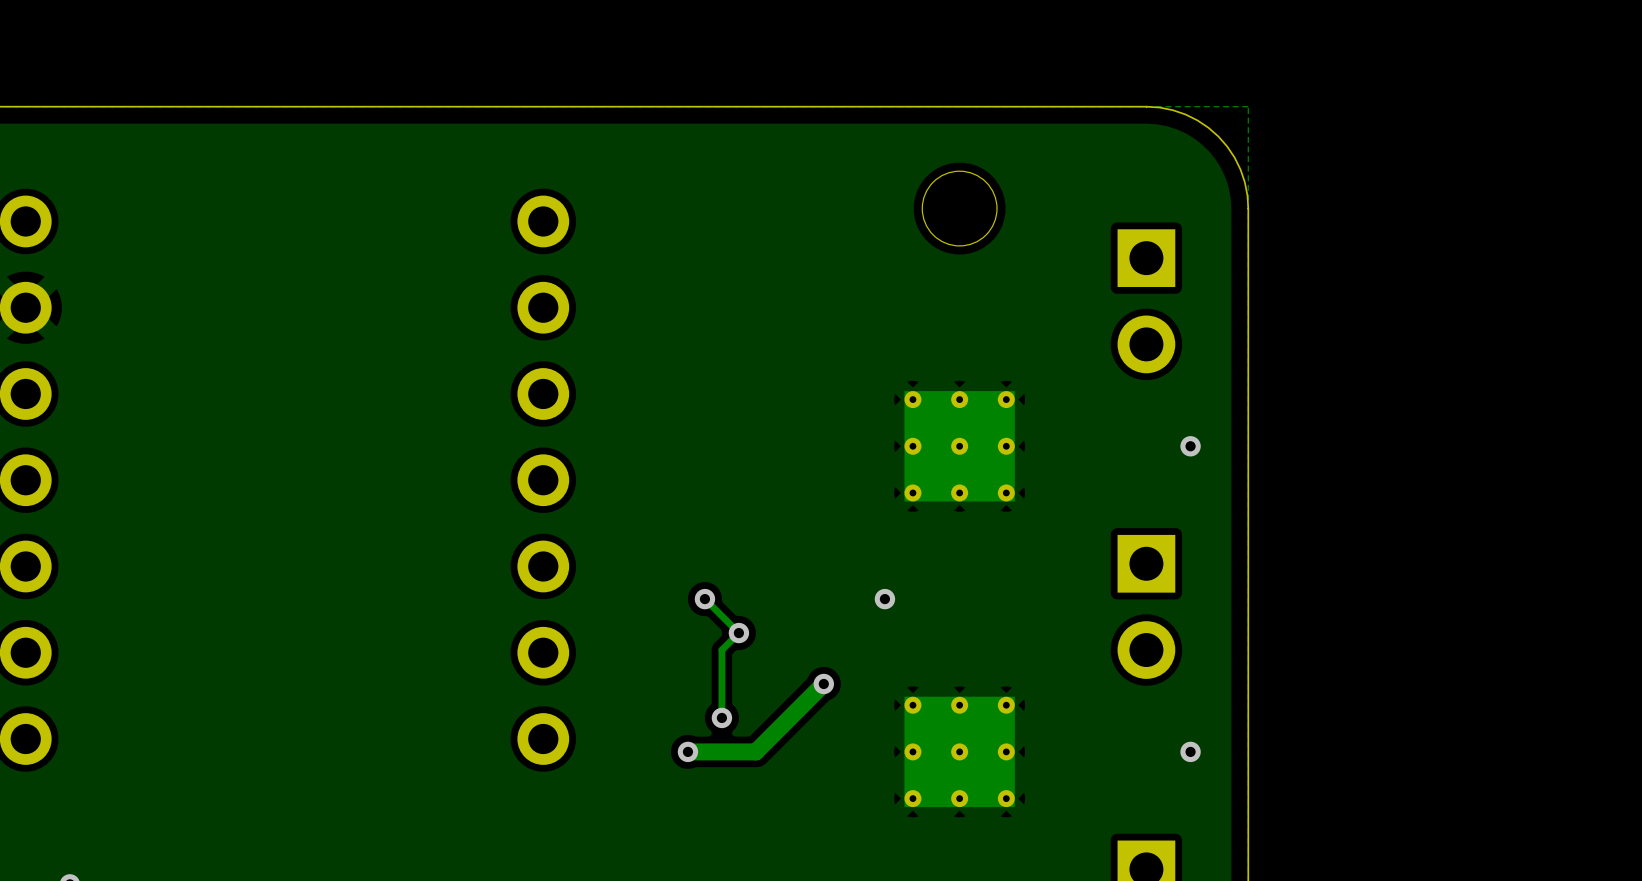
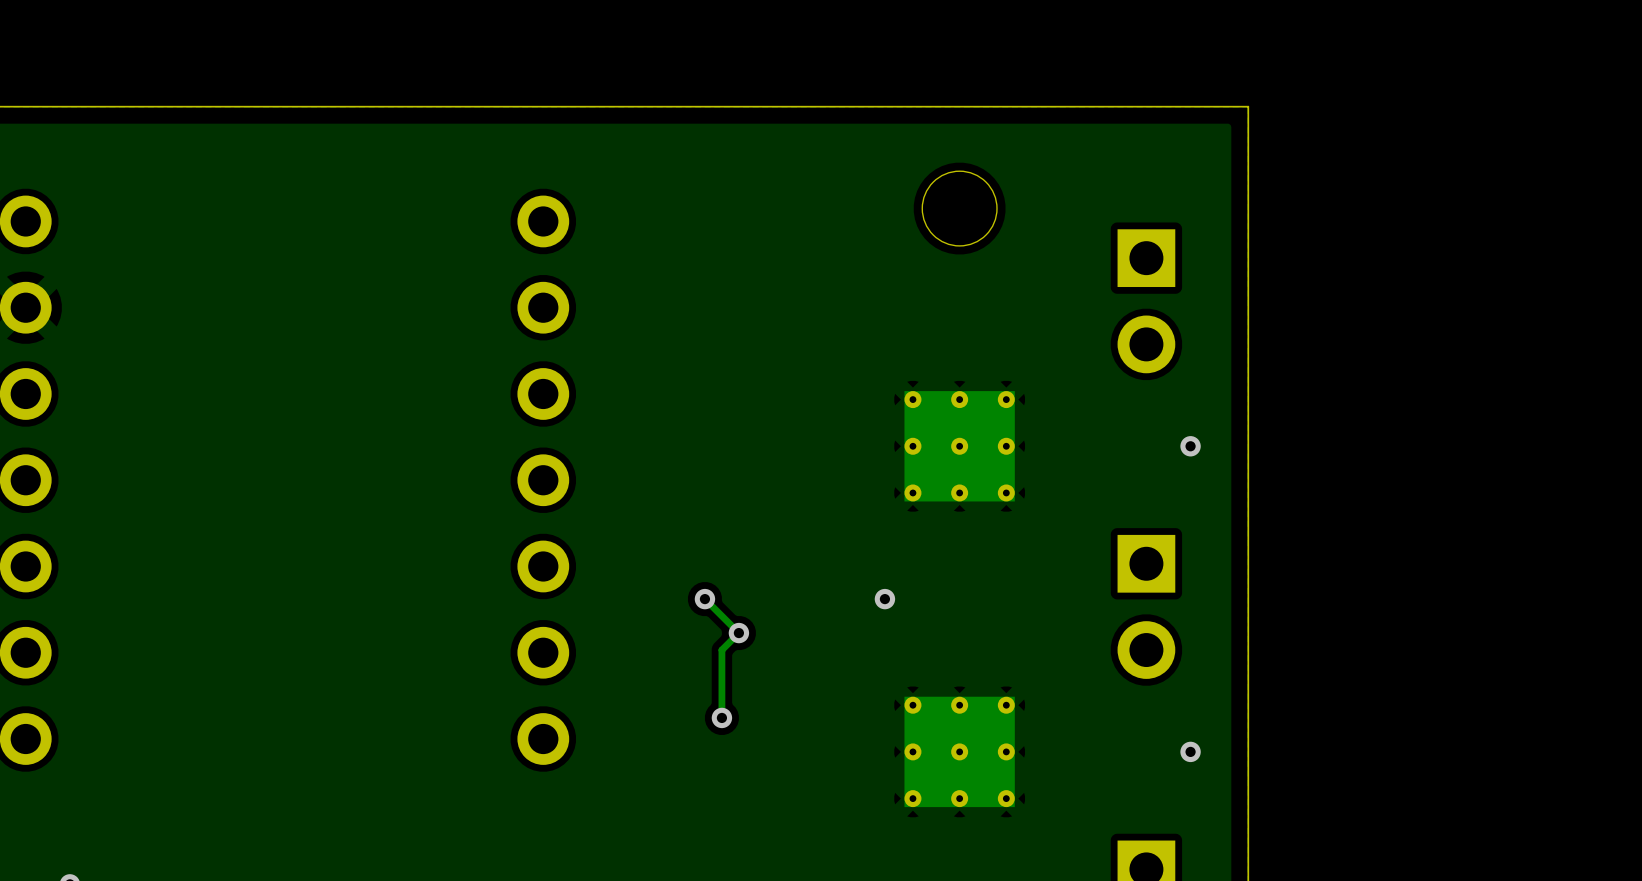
board edge: (1146, 106) (1159, 107) (1185, 114) (1208, 127) (1218, 136) (1227, 146) (1240, 169) (1244, 182) (1248, 208) -> (1146, 106) (1248, 106) (1248, 208)
track: (823, 683) (755, 751) (687, 751) -> none
via: (823, 683) -> none
via: (687, 751) -> none

